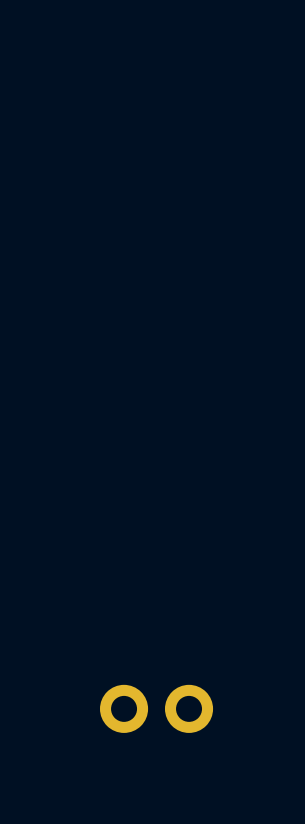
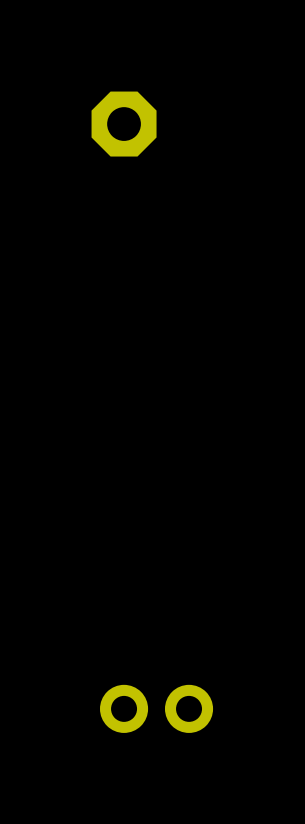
part: none -> (124, 124)

